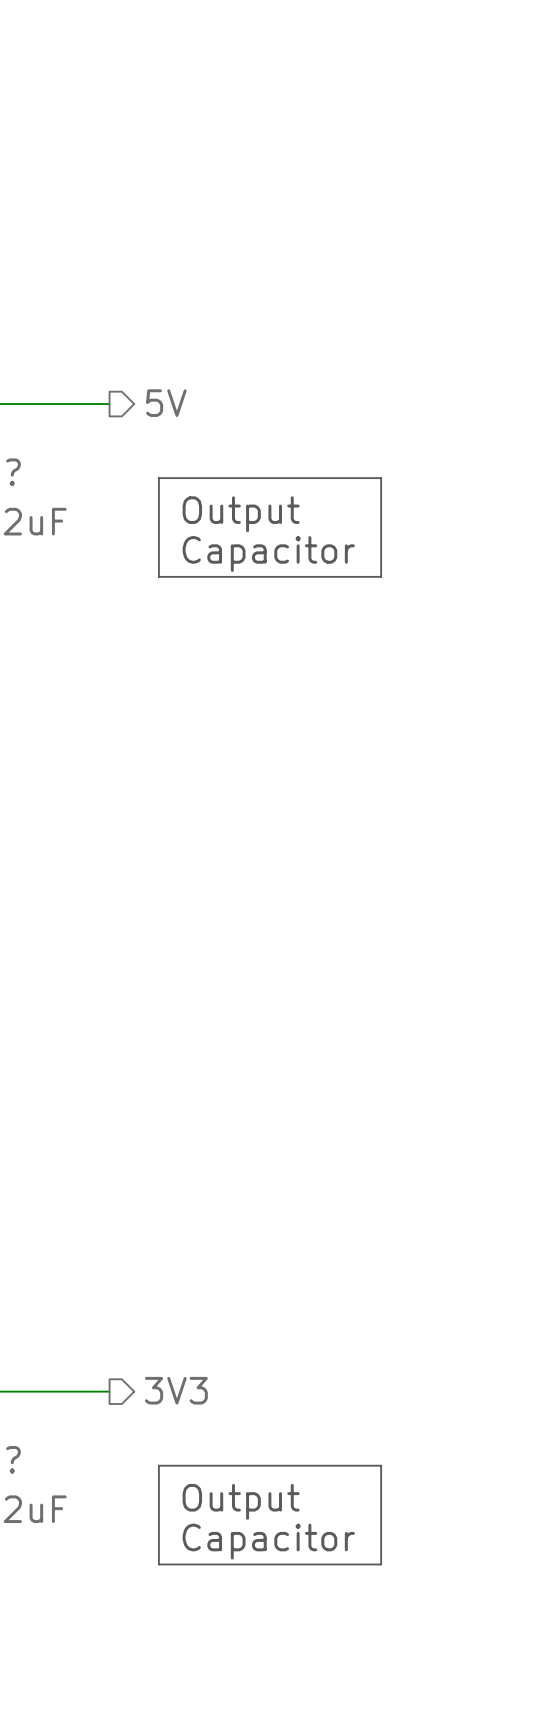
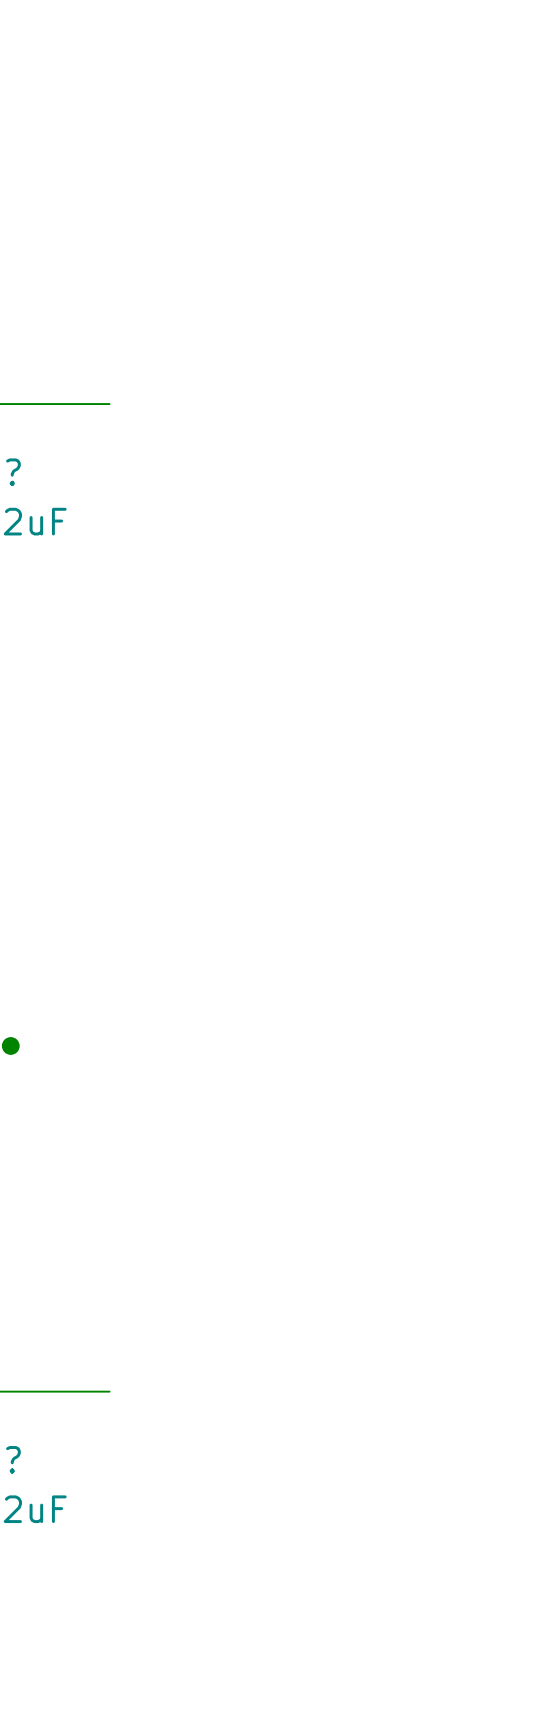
hierarchical label: 5V (166, 403) -> none
line: (158, 478) (158, 576) (381, 576) (381, 478) (158, 478) -> none
text: Output (241, 514) -> none
text: Capacitor (268, 554) -> none
junction: none -> (10, 1045)
hierarchical label: 3V3 (176, 1390) -> none
line: (158, 1465) (381, 1465) (381, 1564) (158, 1564) (158, 1465) -> none
text: Output (241, 1501) -> none
text: Capacitor (268, 1541) -> none

